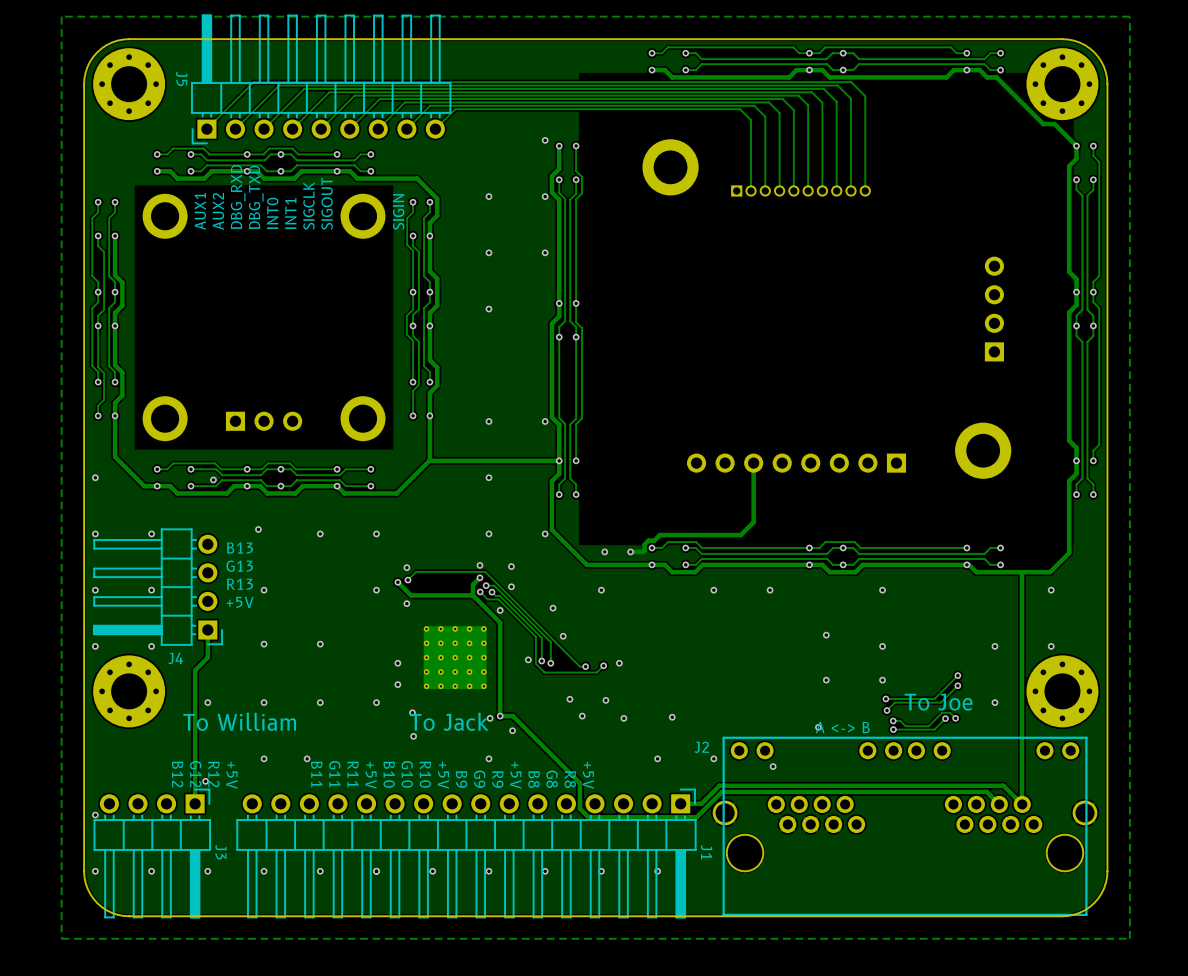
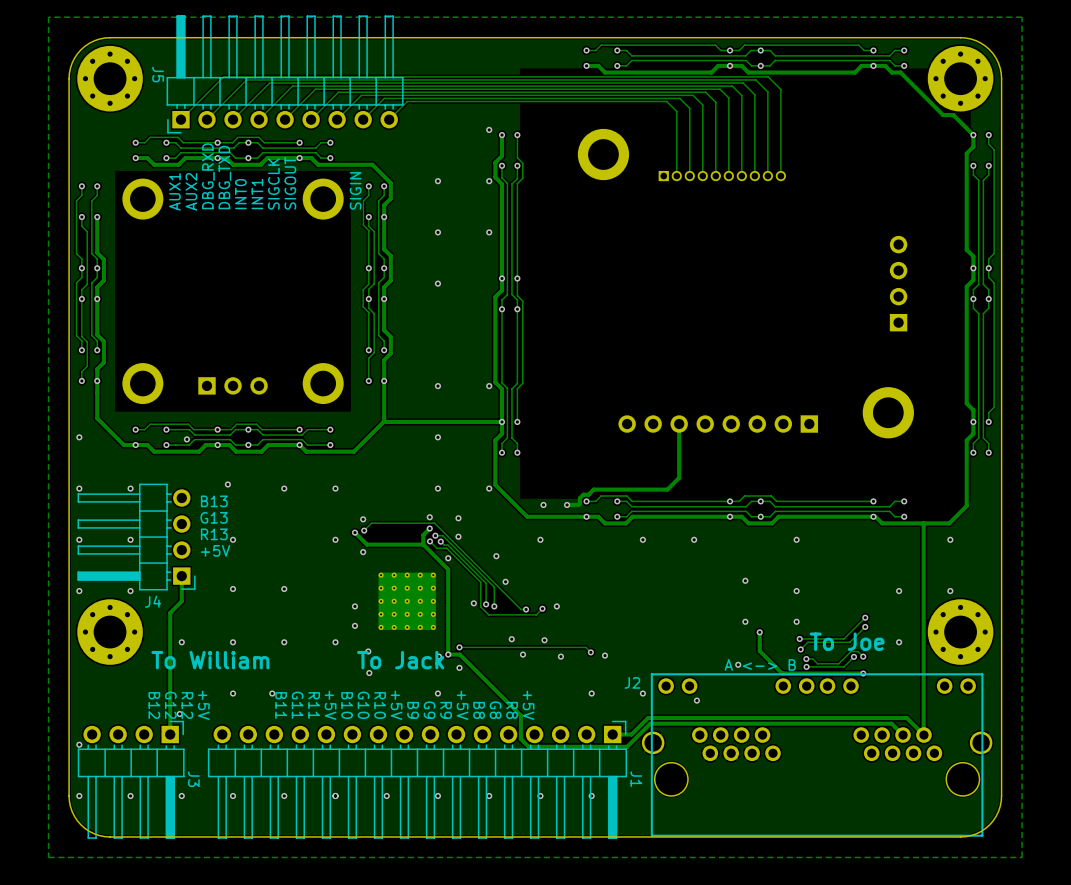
track: none -> (759, 632) (759, 650) (782, 673) (863, 673)
via: none -> (759, 632)
track: none -> (459, 647) (585, 647) (590, 652)
via: none -> (459, 647)
via: none -> (590, 652)
via: none -> (863, 673)

